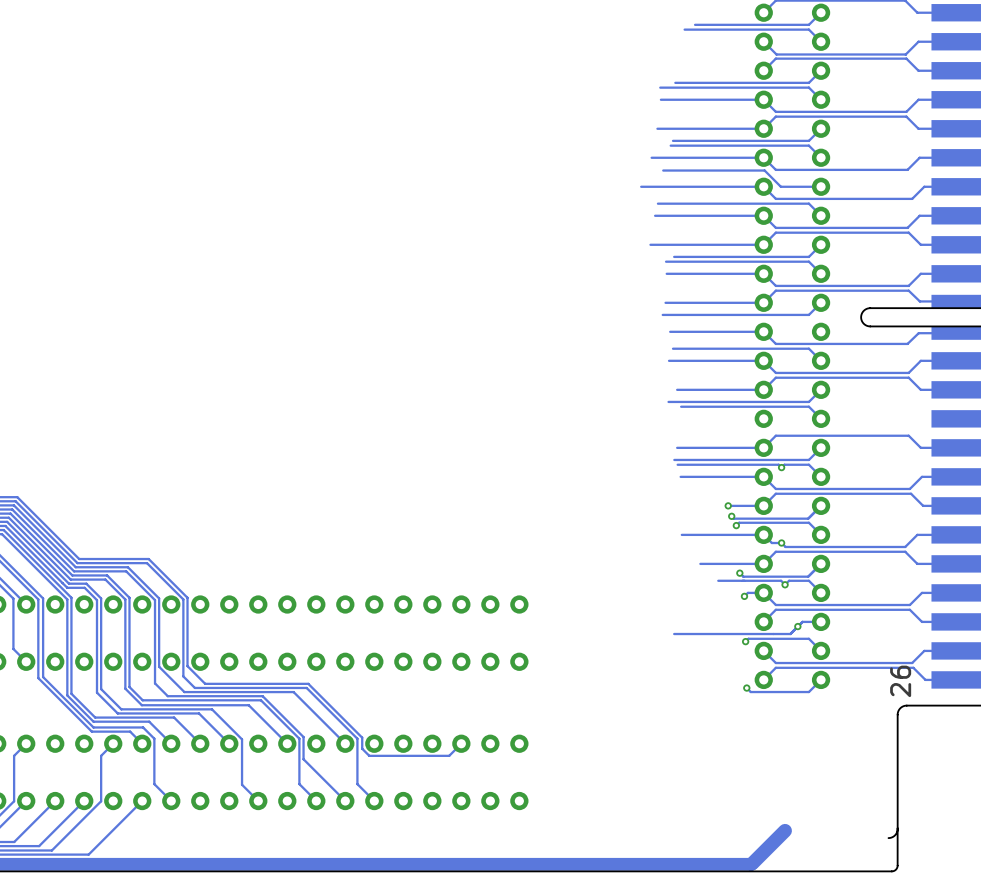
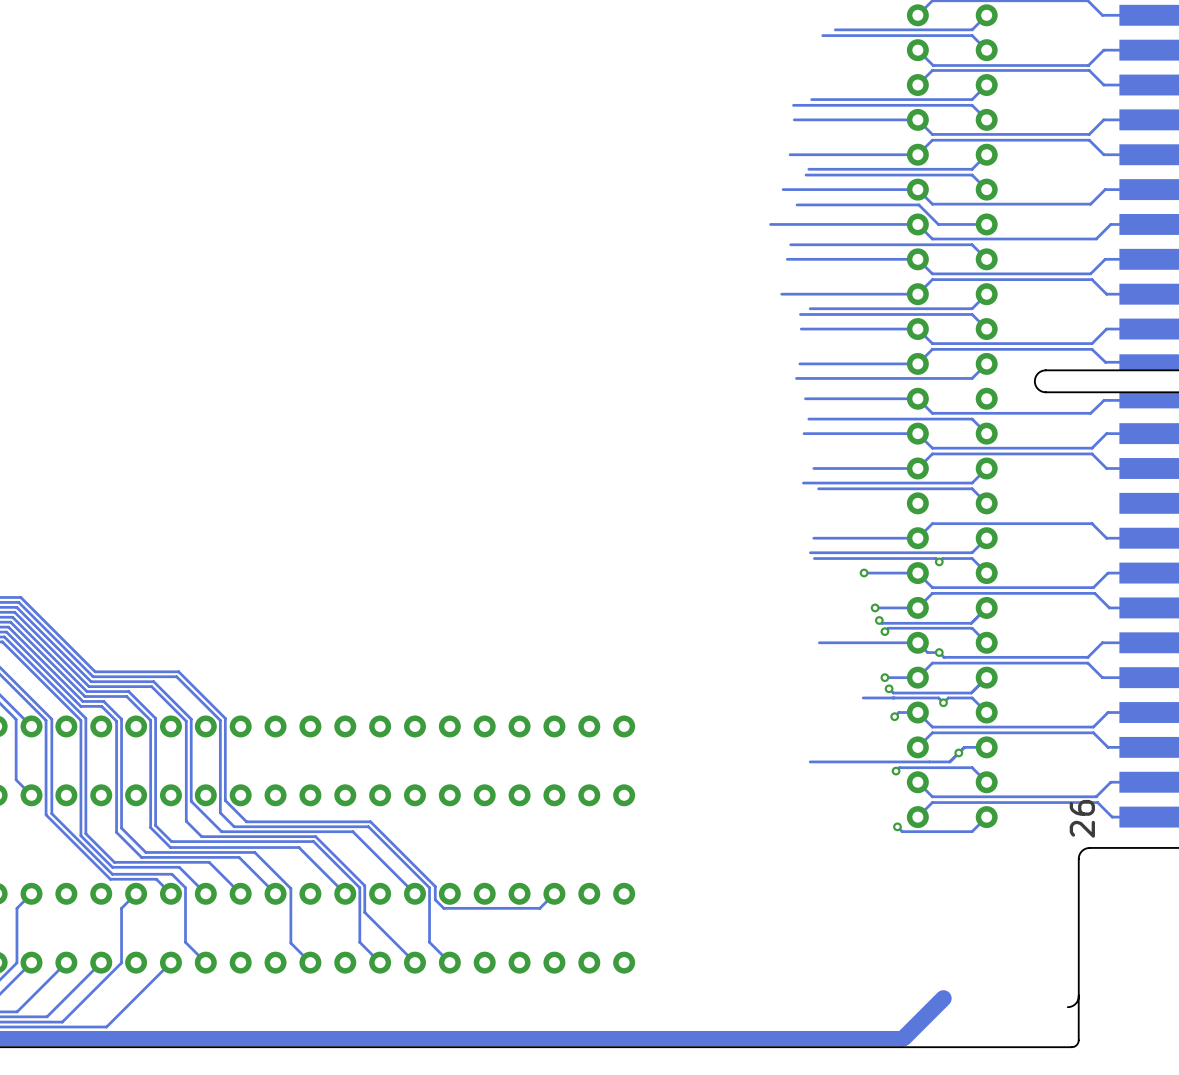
track: (719, 476) (680, 476) -> none
via: none -> (864, 572)
track: (736, 563) (700, 563) -> none
via: none -> (884, 677)

